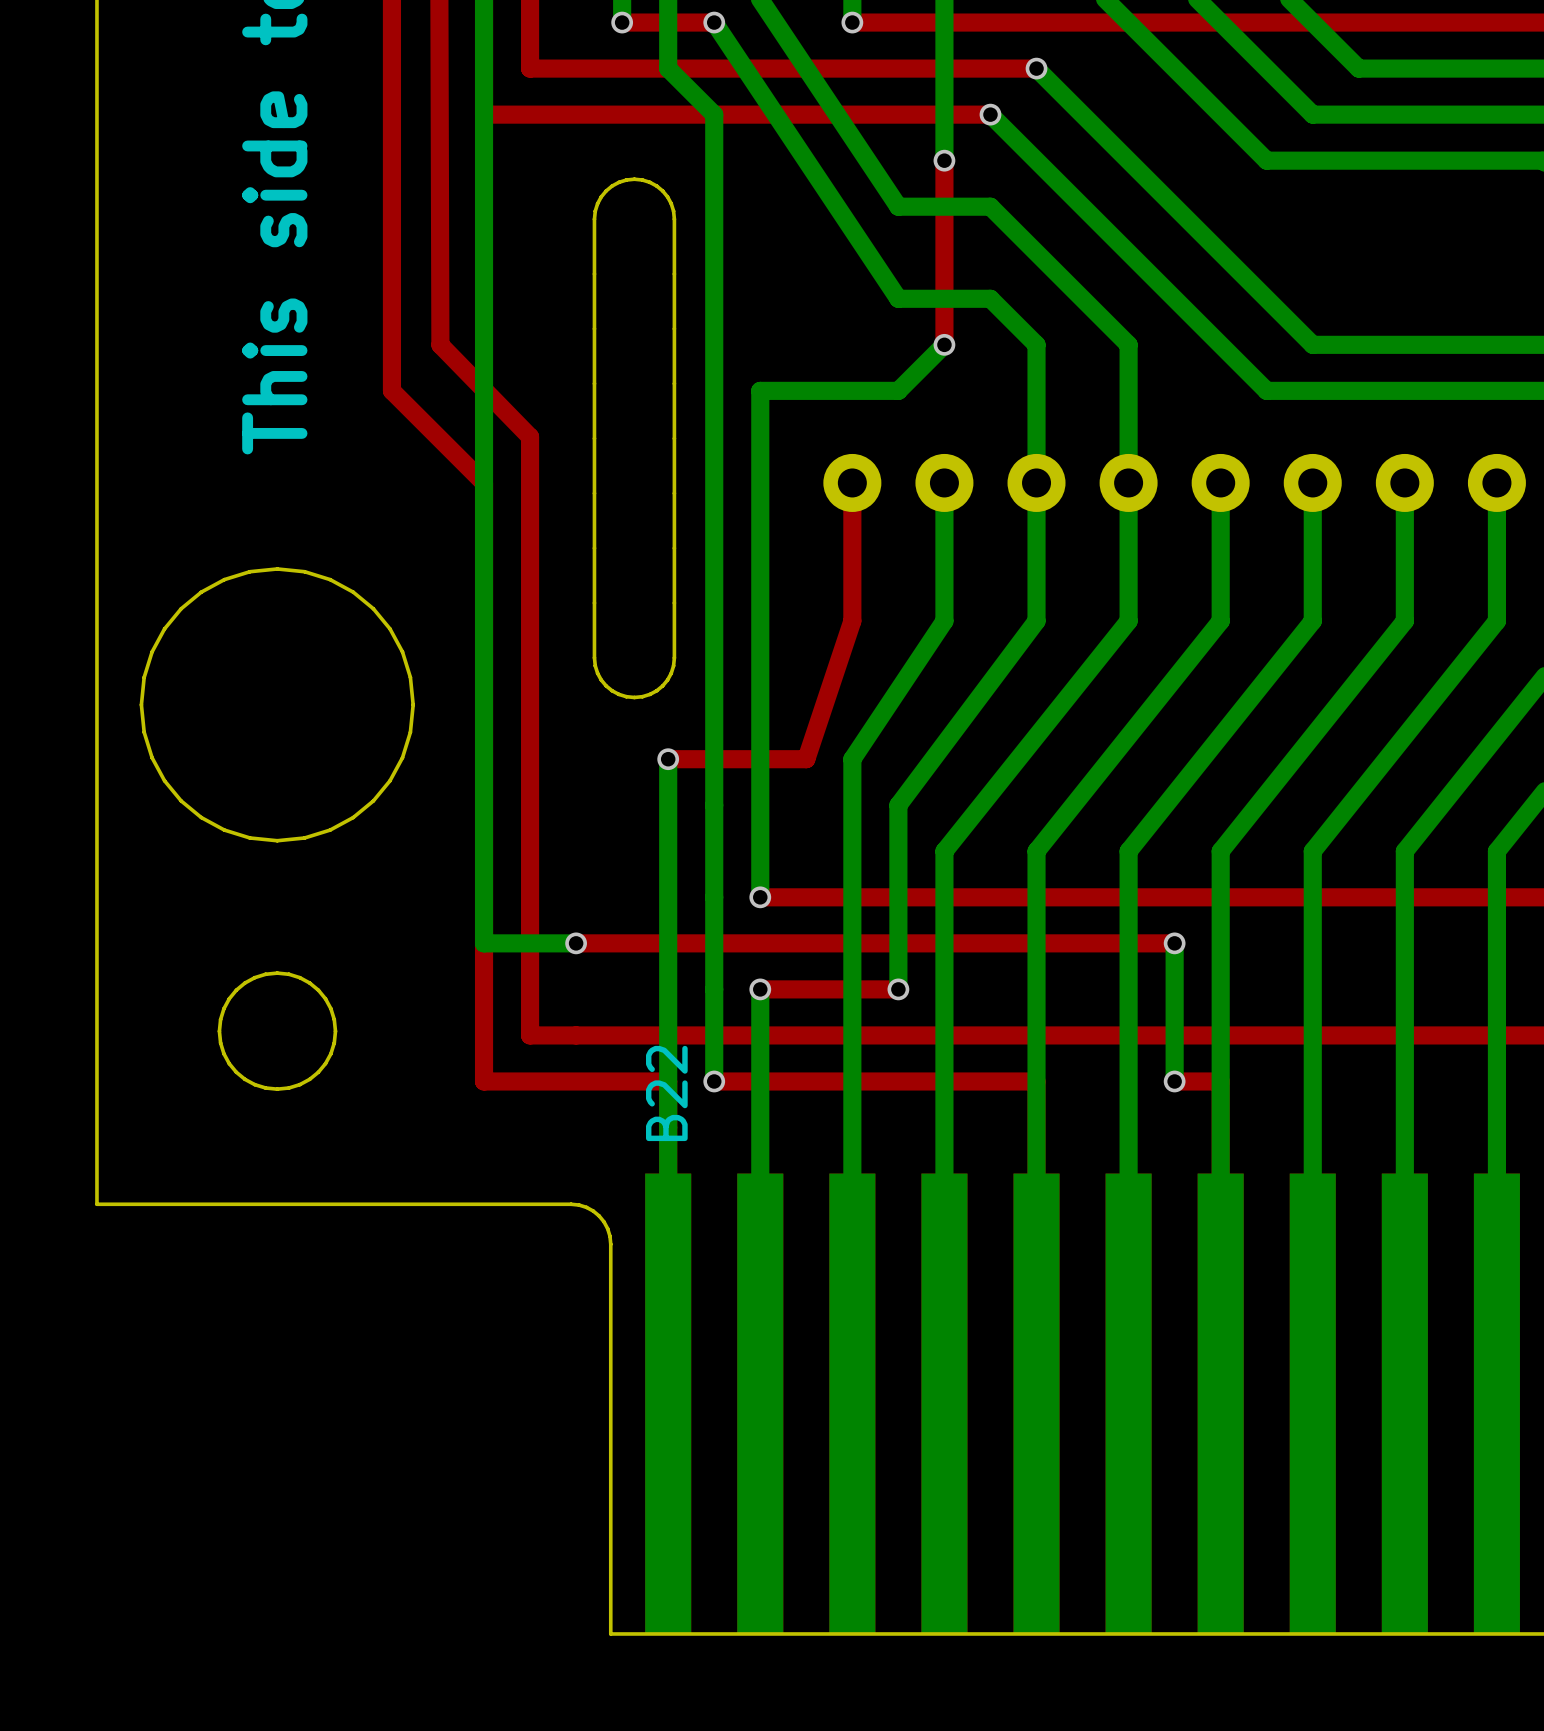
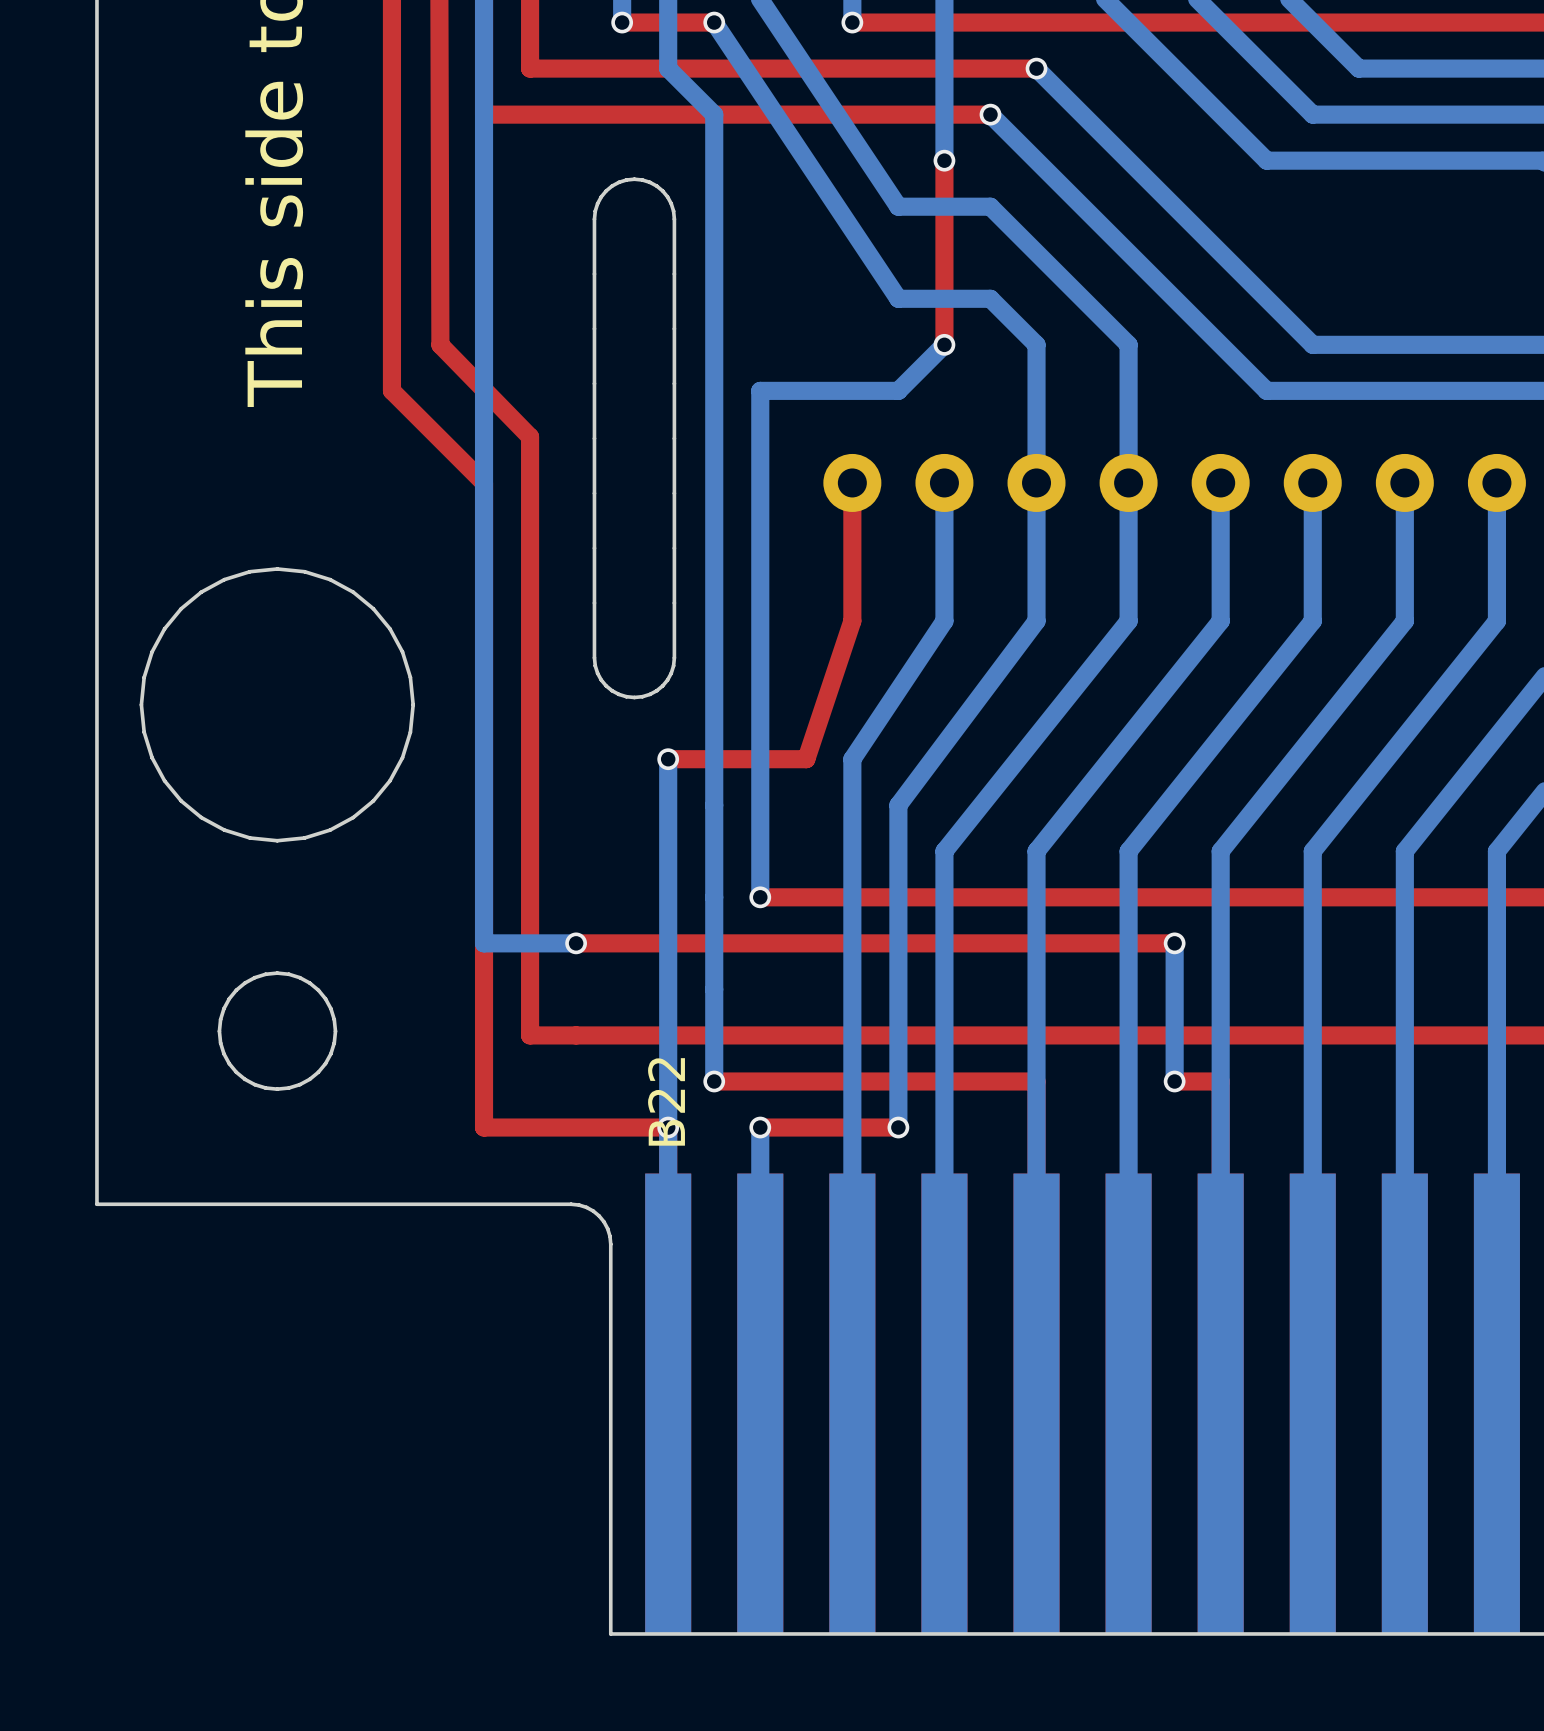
bottom track: (760, 989) (760, 1127) -> (898, 989) (898, 1127)
via: (760, 989) -> none
top track: (898, 989) (760, 989) -> (898, 1127) (760, 1127)
via: (898, 989) -> none
top track: (484, 1081) (668, 1081) (668, 1127) -> (484, 1081) (484, 1127) (668, 1127)
via: none -> (668, 1127)
via: none -> (760, 1127)
via: none -> (898, 1127)

